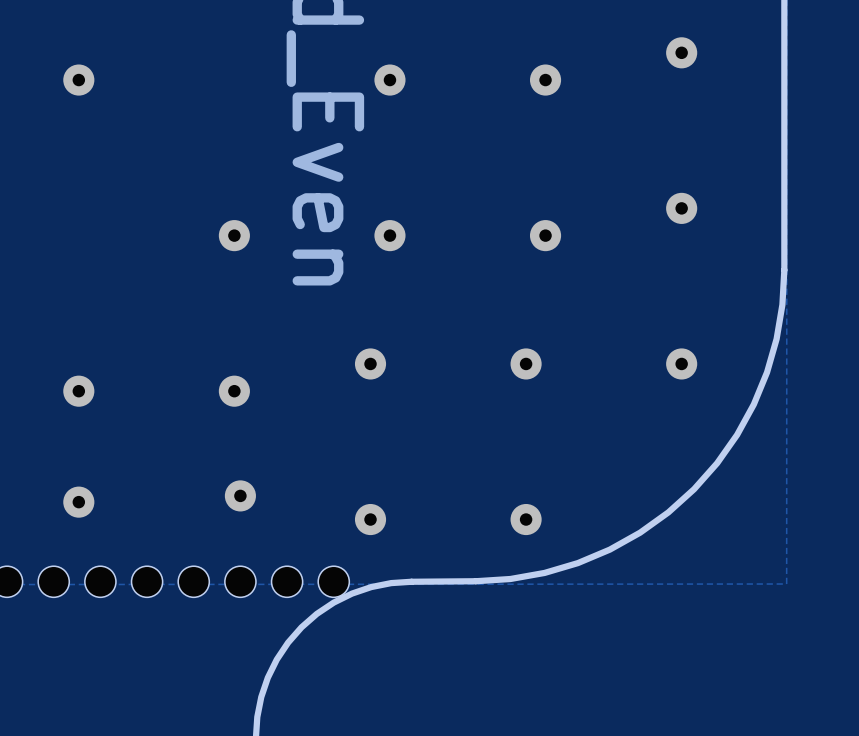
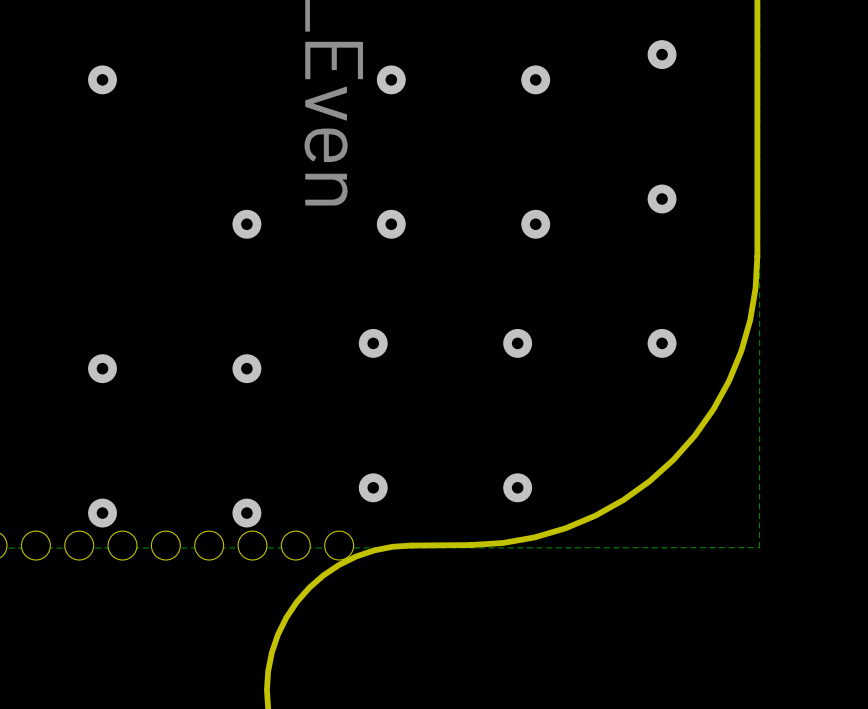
via position: (240, 495) -> (246, 513)
via position: (78, 502) -> (102, 513)

